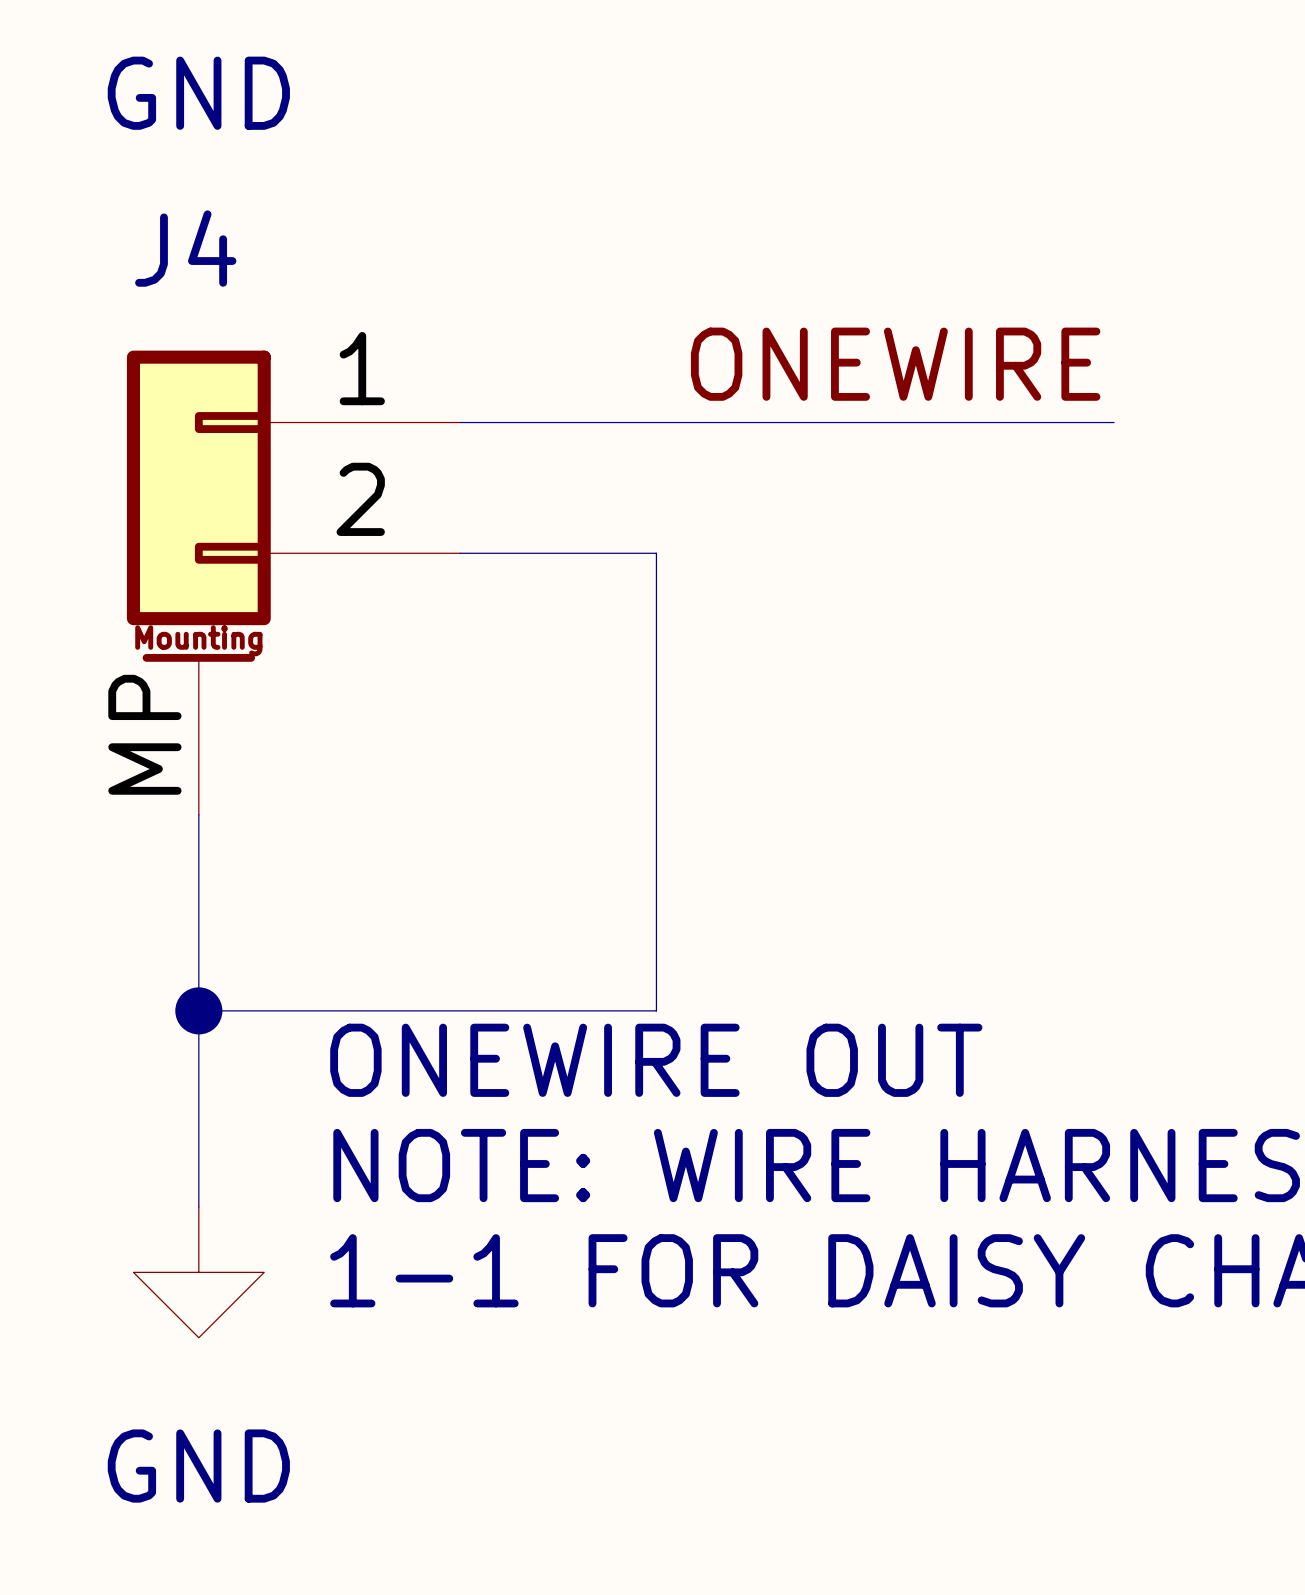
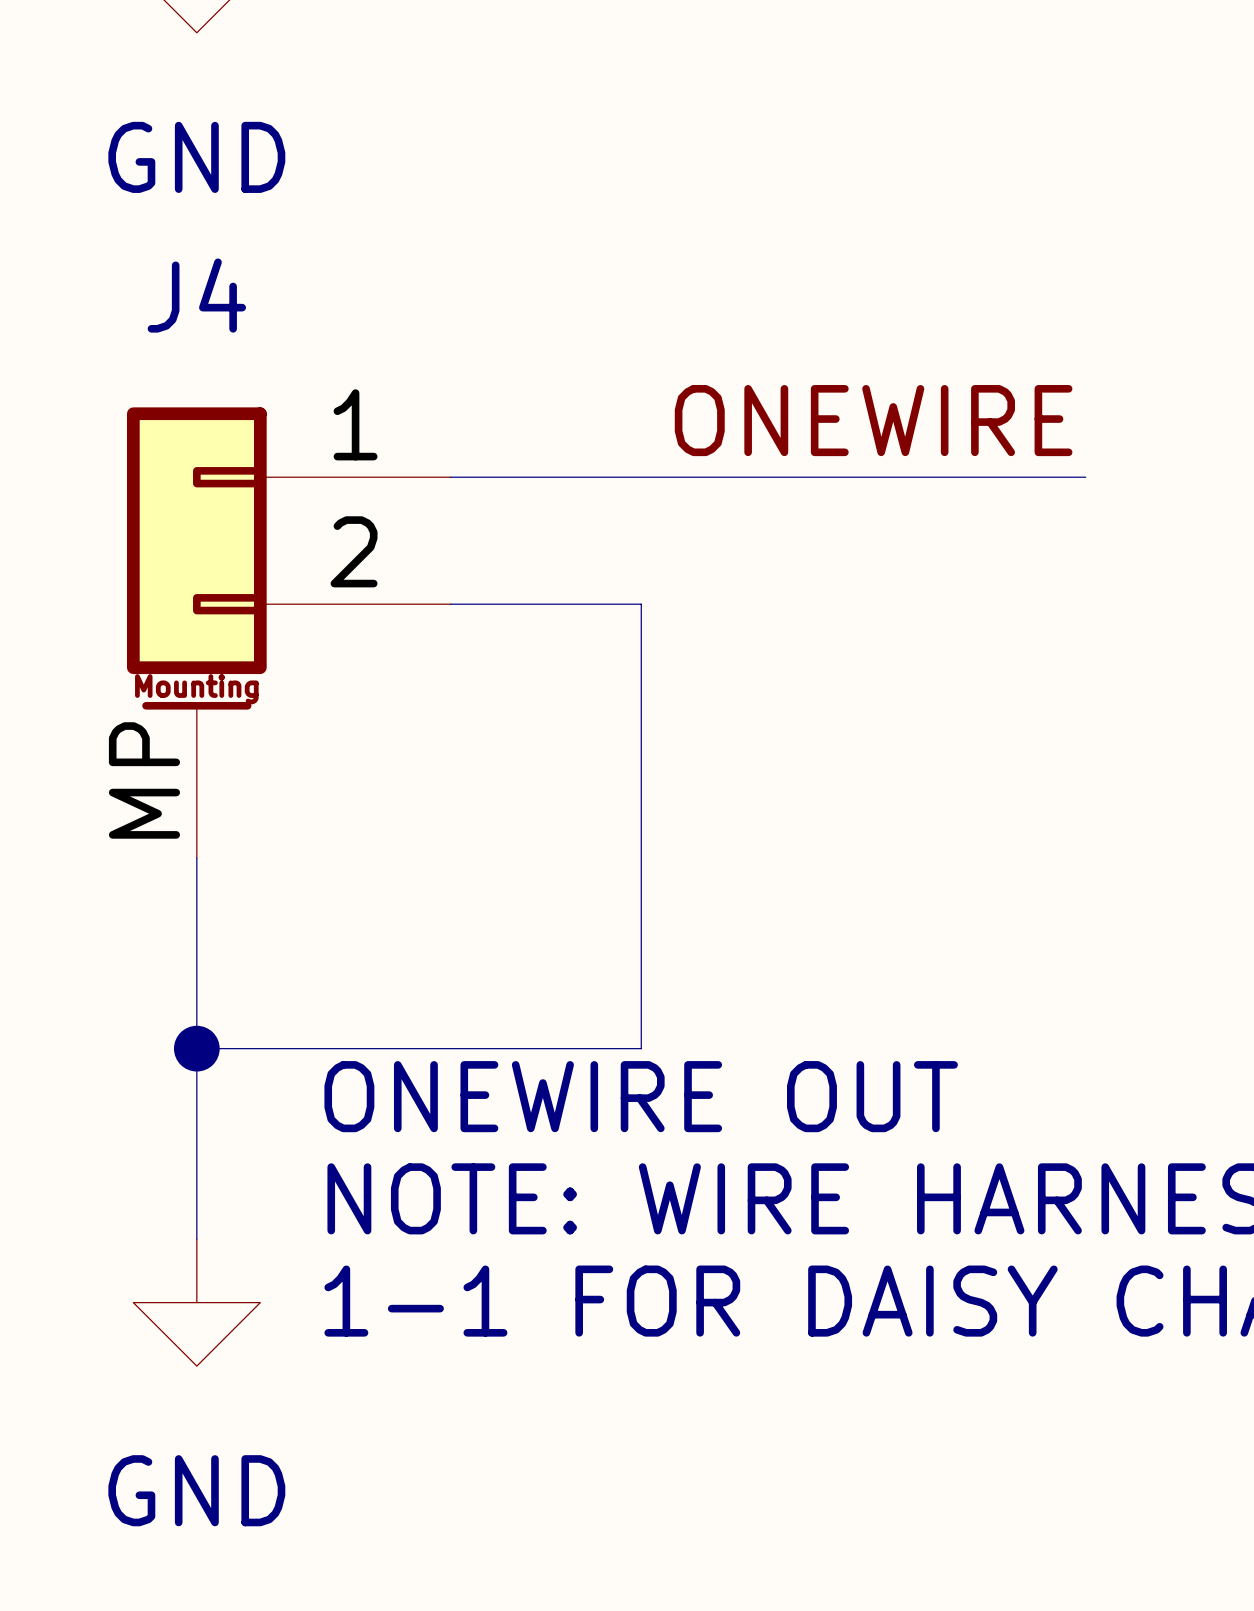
J4 name position: J4 (185, 248) -> J4 (196, 295)

